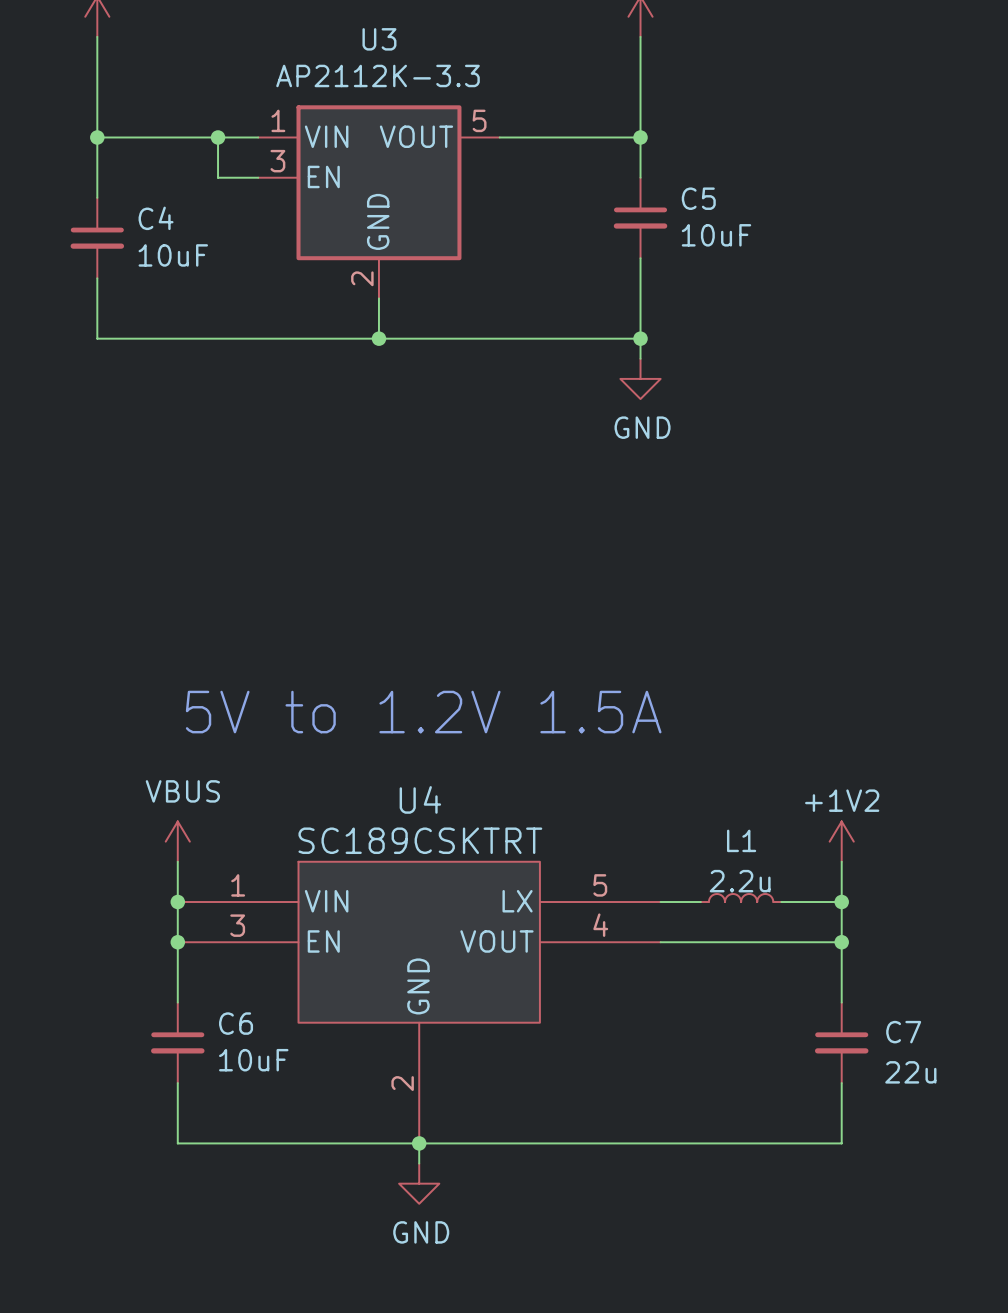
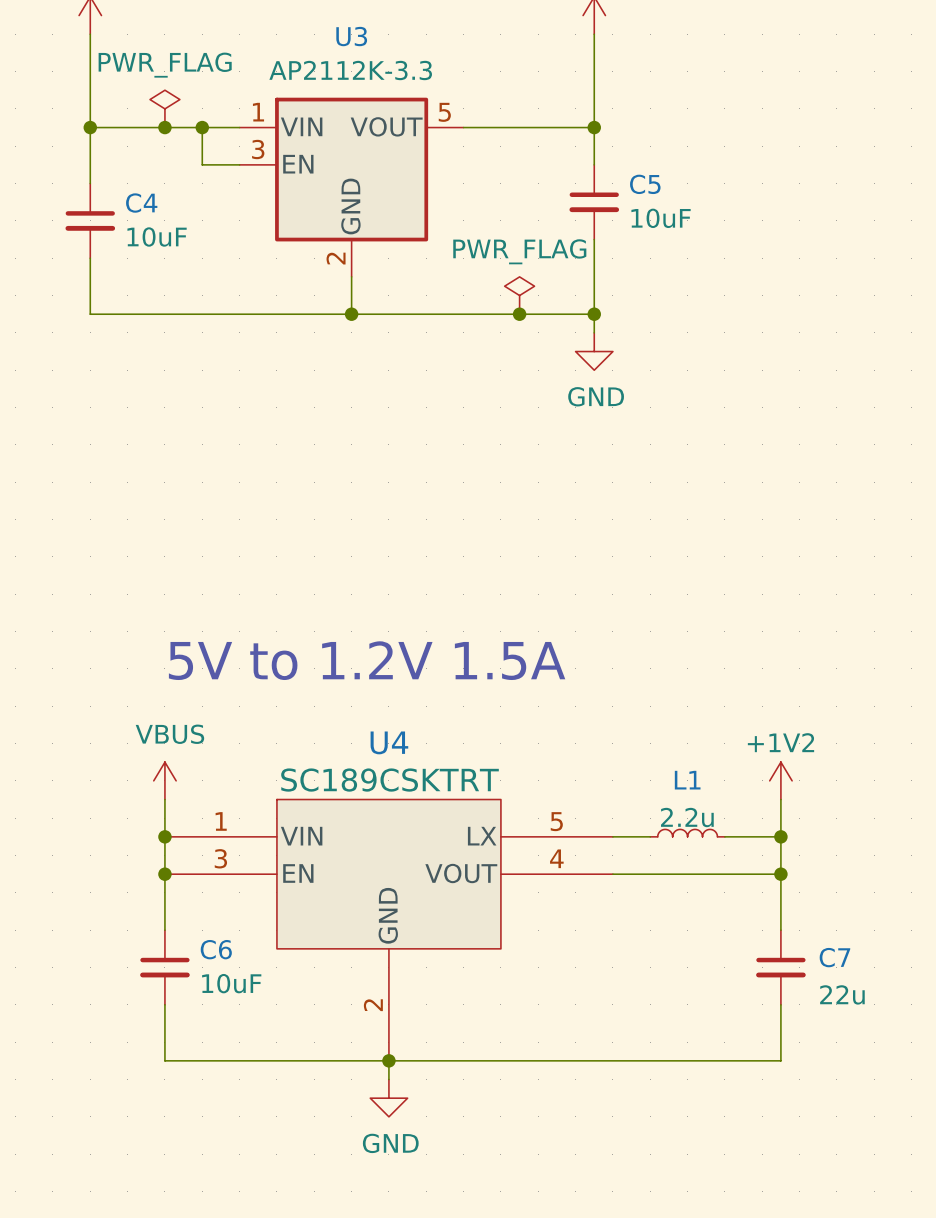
power symbol: none -> PWR_FLAG (164, 108)
junction: none -> (164, 127)
power symbol: none -> PWR_FLAG (519, 295)
junction: none -> (519, 314)

